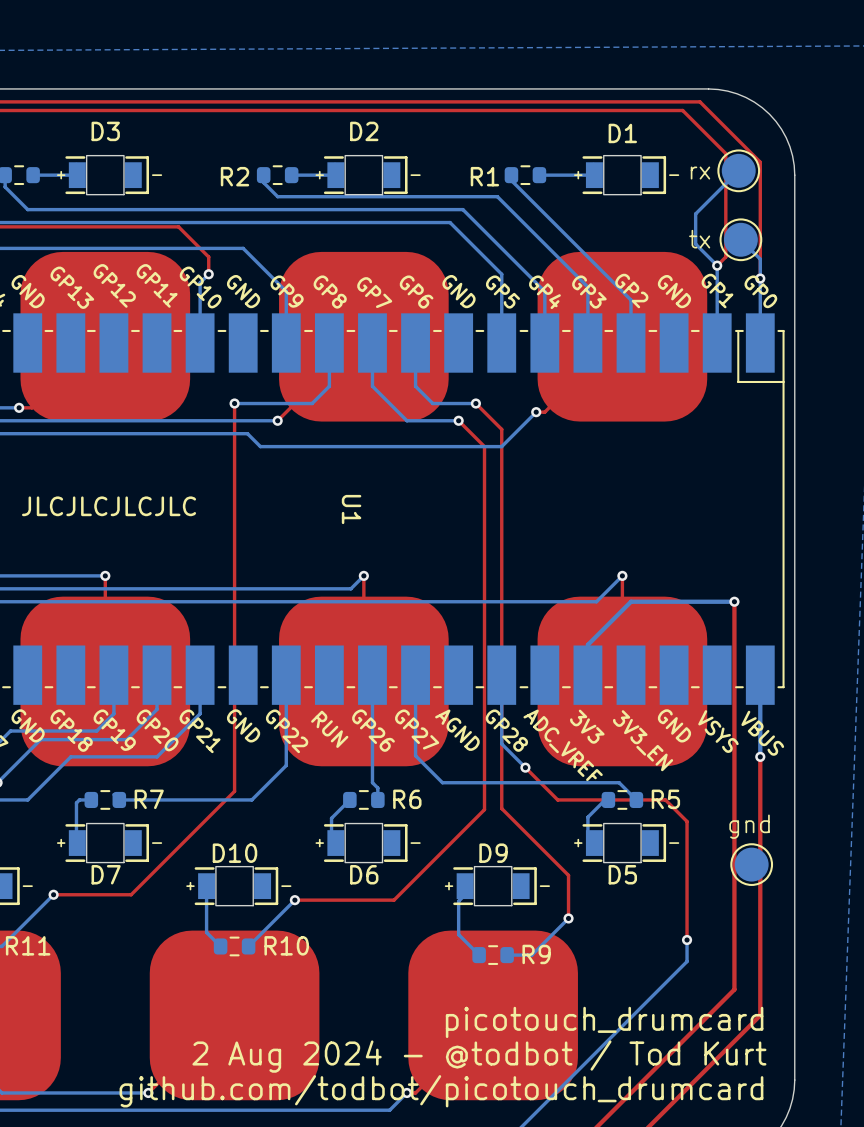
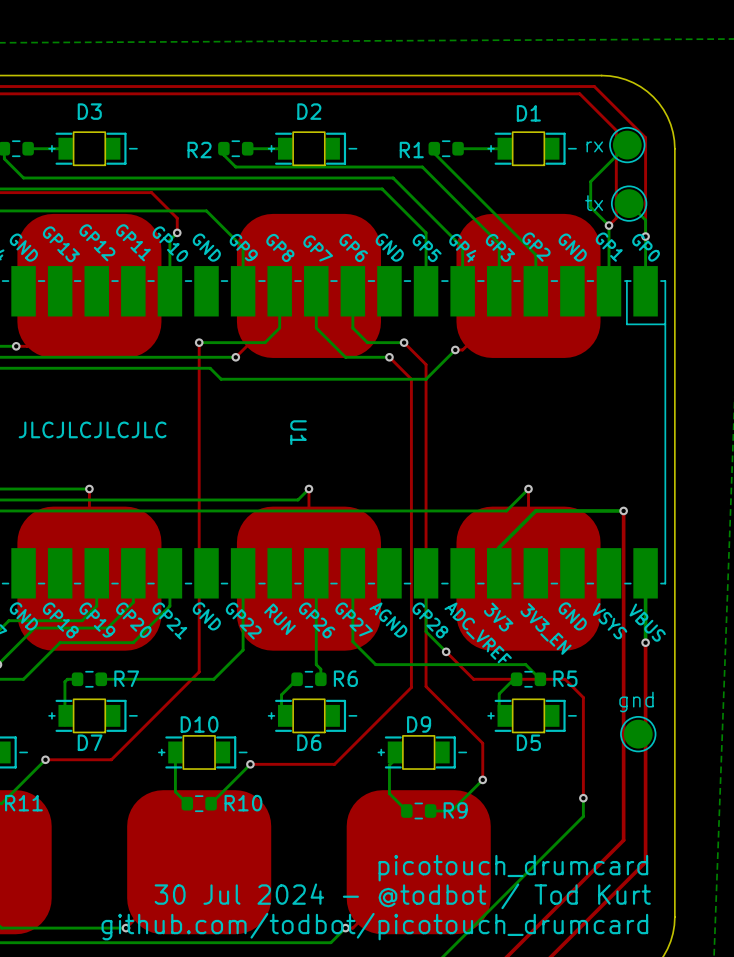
text: 2 Aug 2024 - @todbot / Tod Kurt (479, 1056) -> 30 Jul 2024 - @todbot / Tod Kurt (402, 896)

